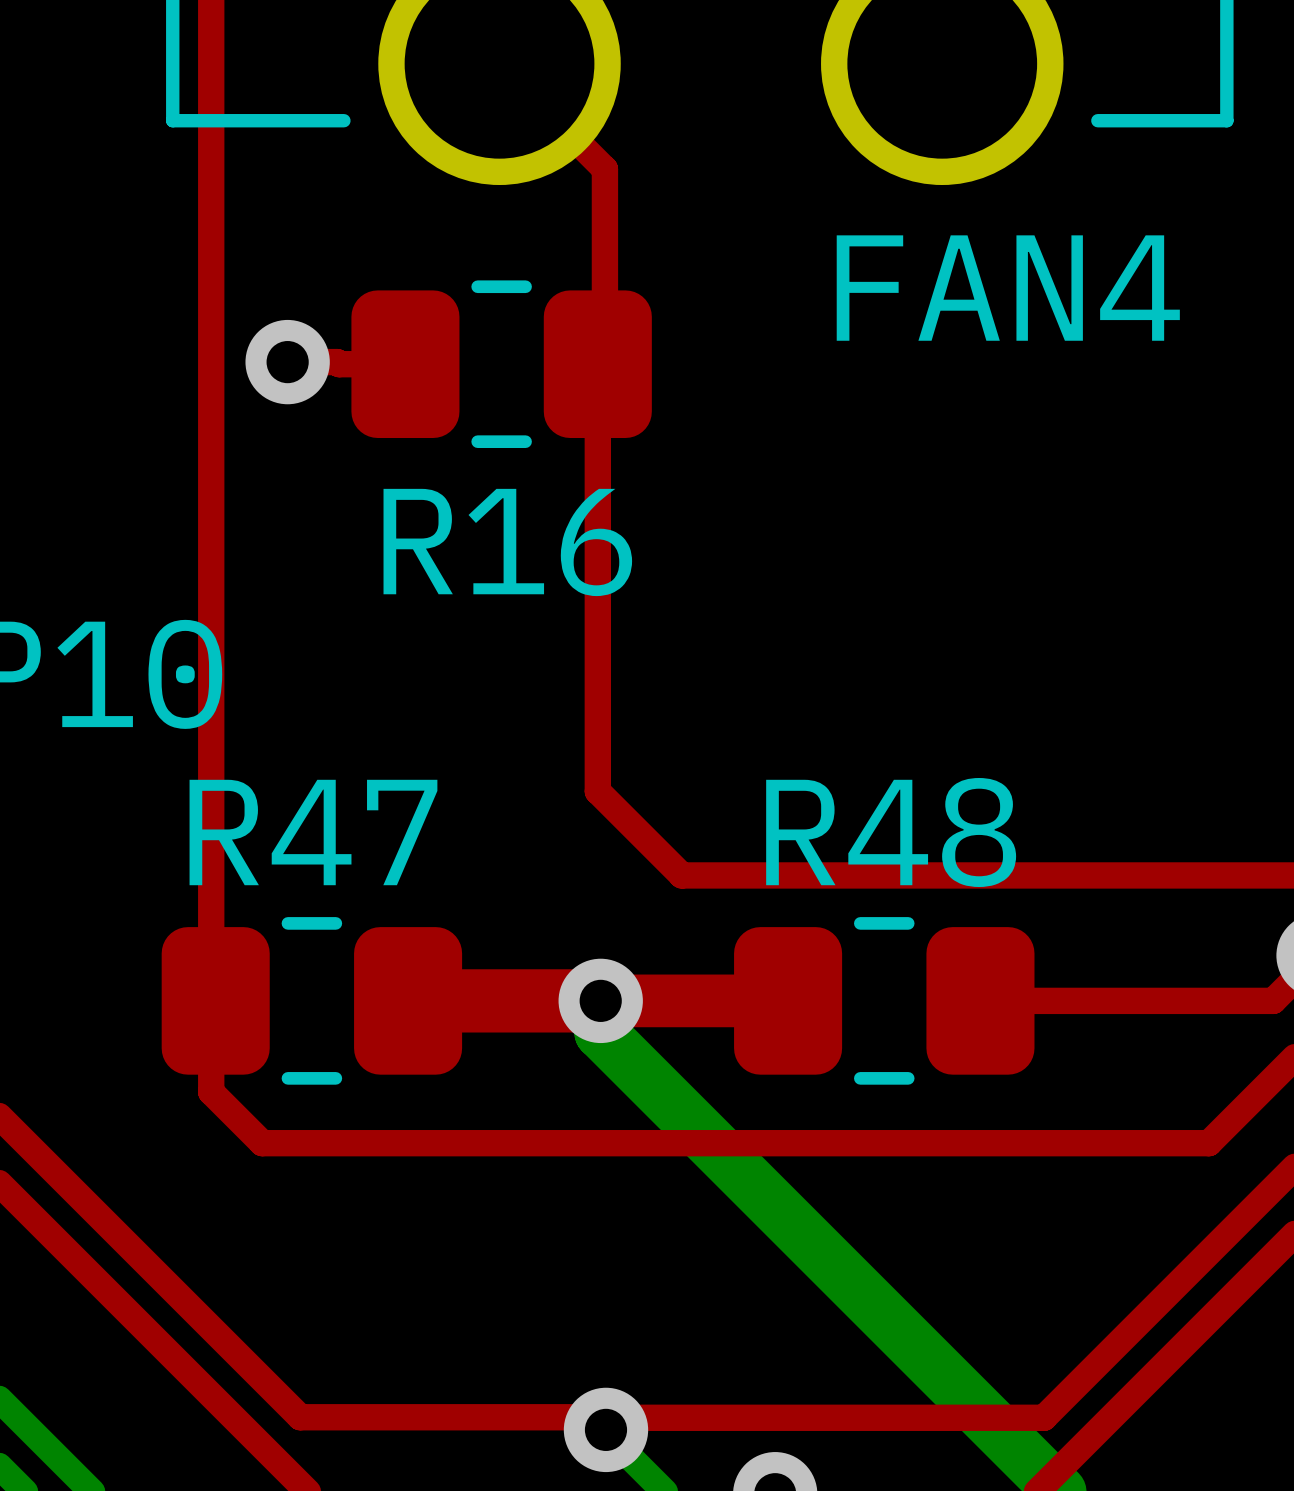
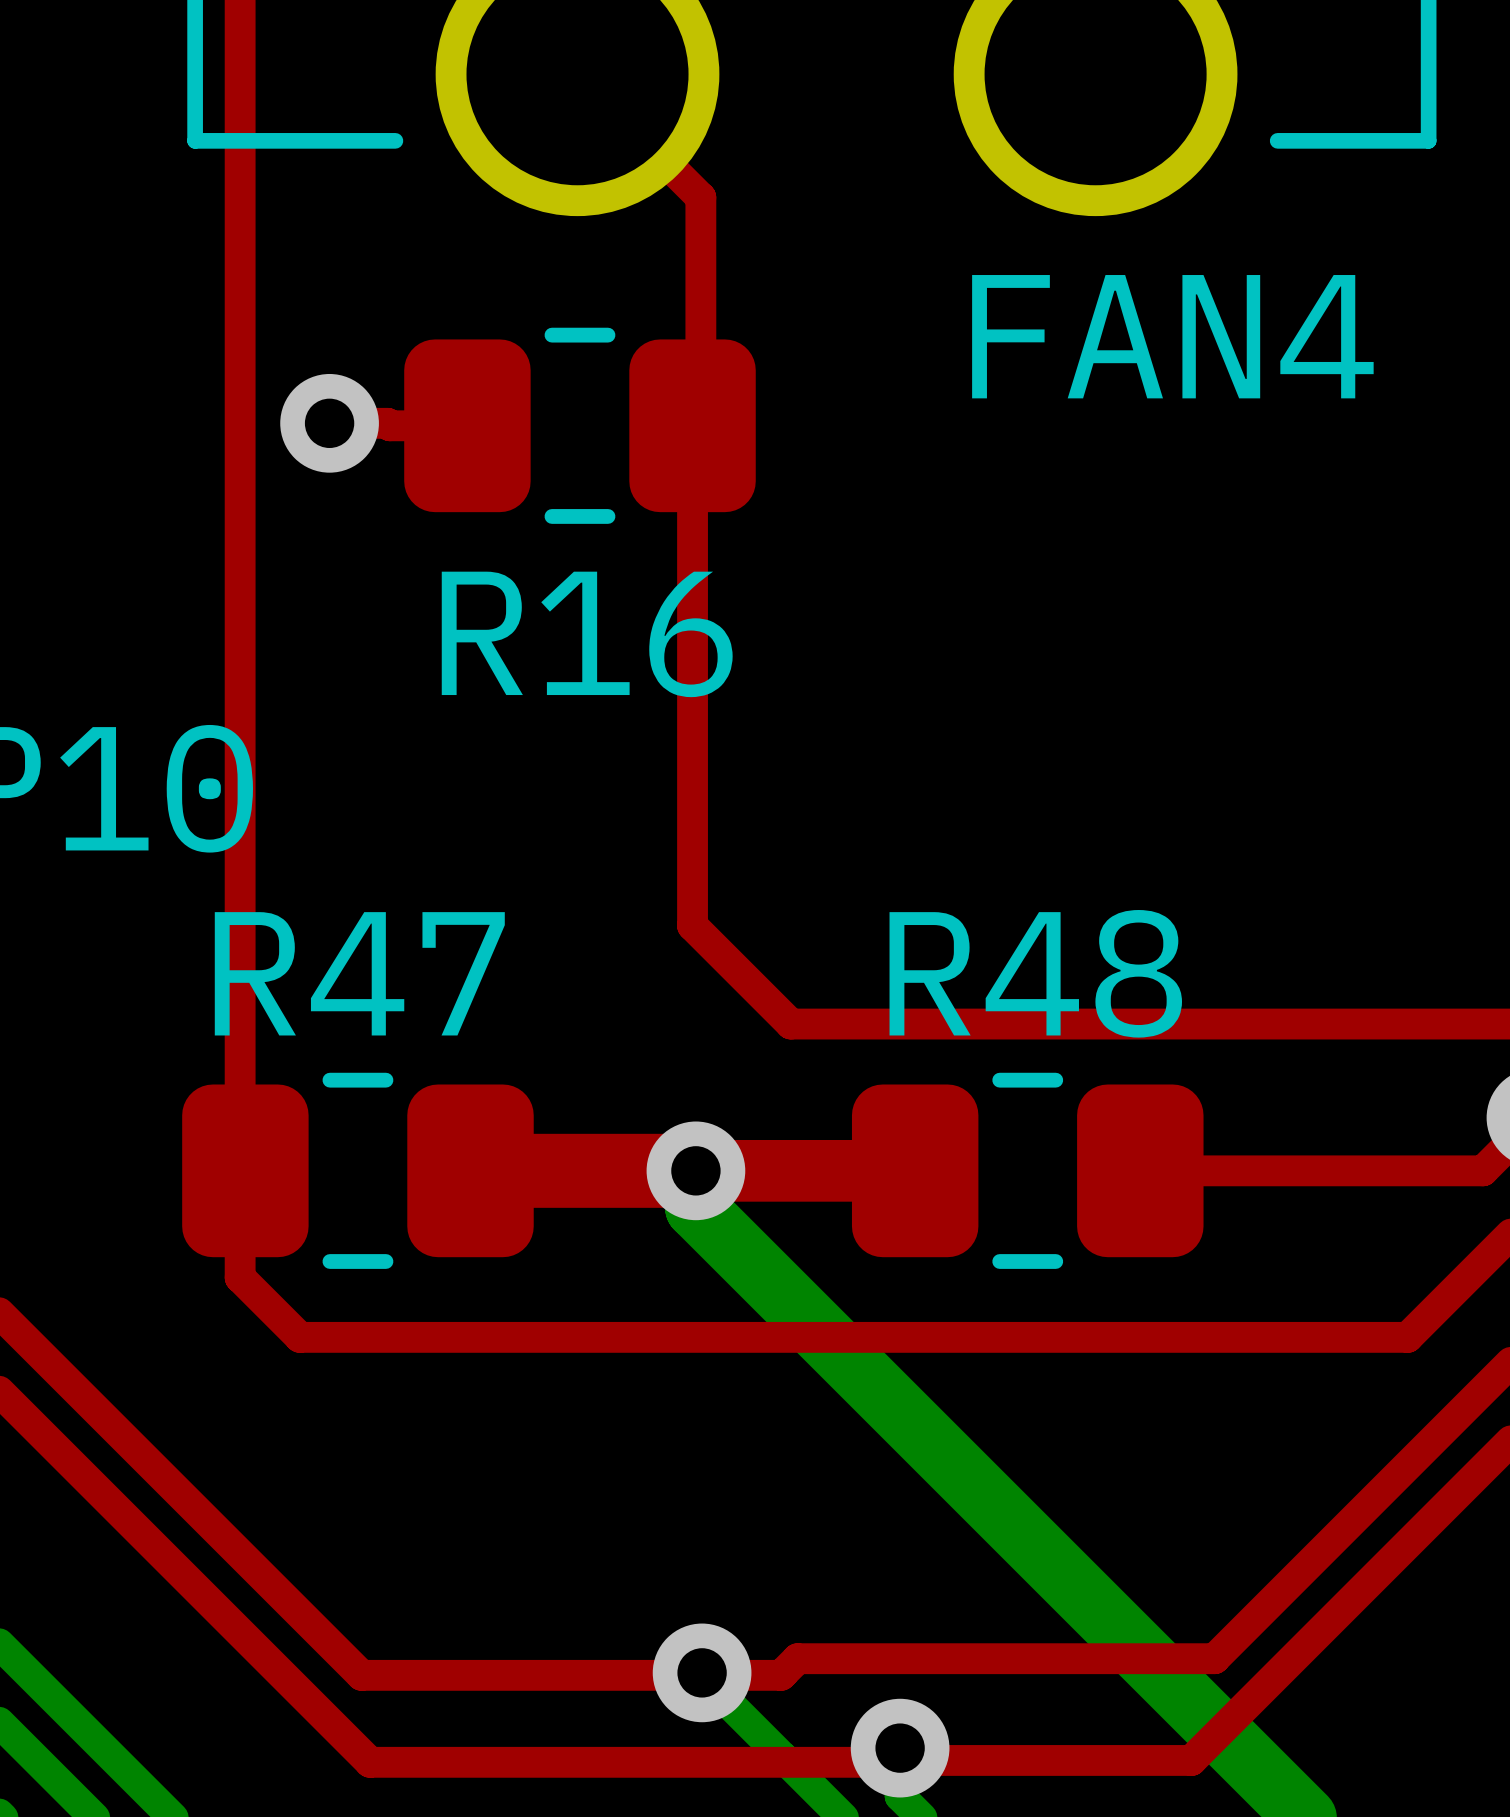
top track: (300, 1417) (593, 1417) (605, 1429) (618, 1417) (687, 1417) -> (344, 1658) (361, 1675) (781, 1675) (797, 1658)

